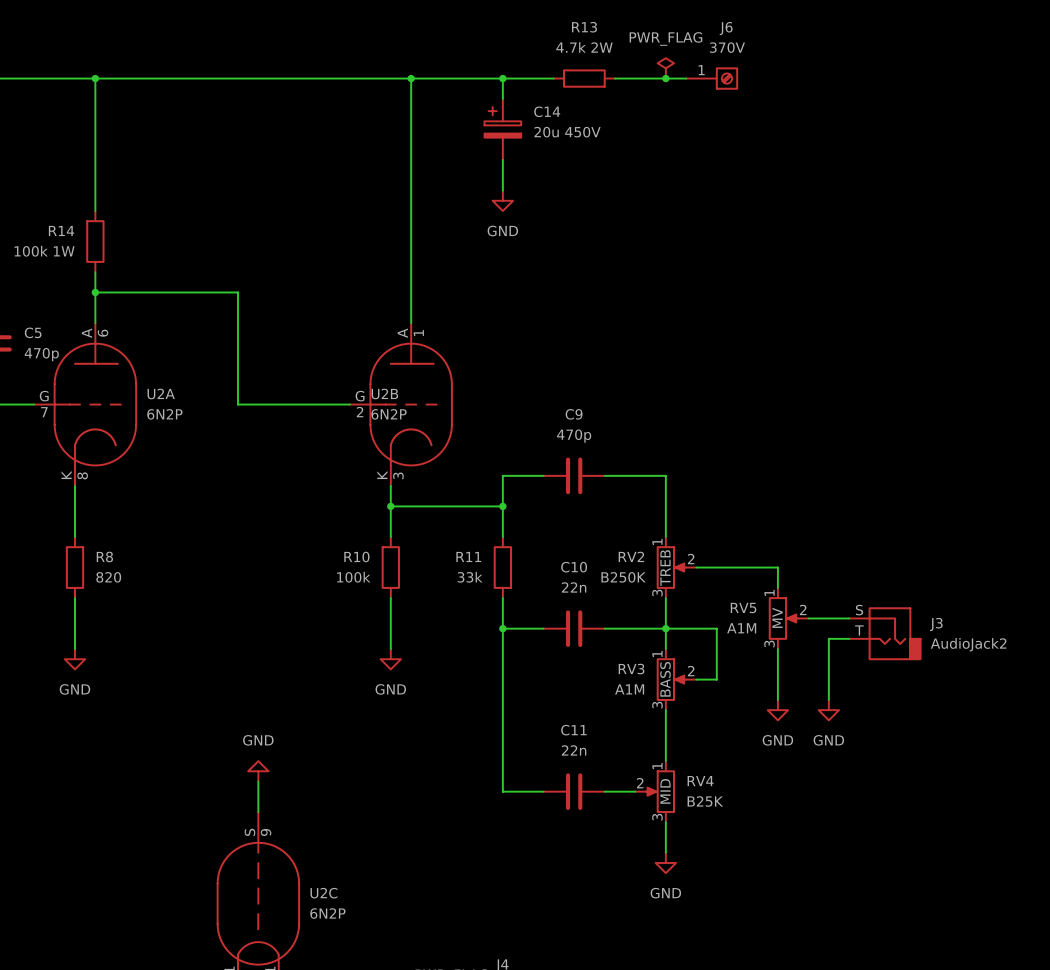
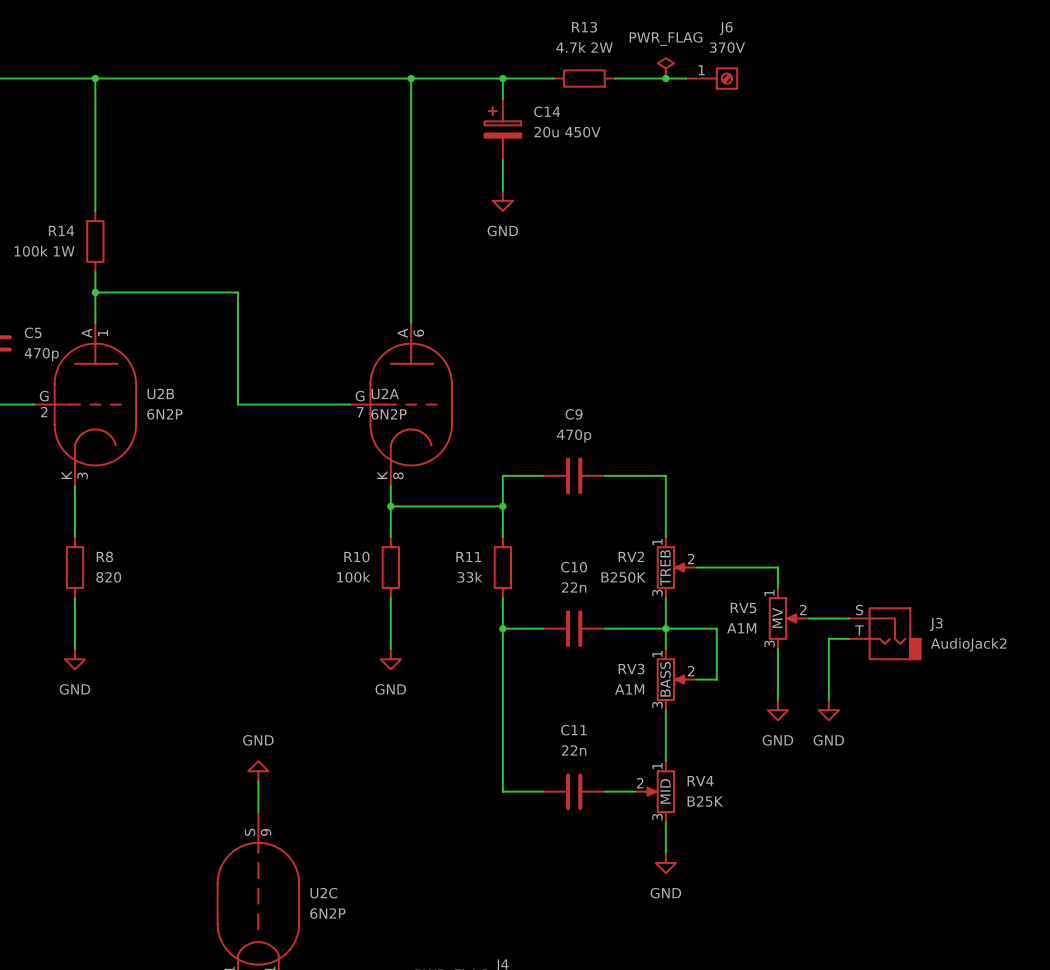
U2A name position: U2A (161, 393) -> U2A (385, 393)
U2B name position: U2B (384, 393) -> U2B (160, 393)
U2A position: (85, 404) -> (400, 404)
U2B position: (400, 404) -> (85, 404)

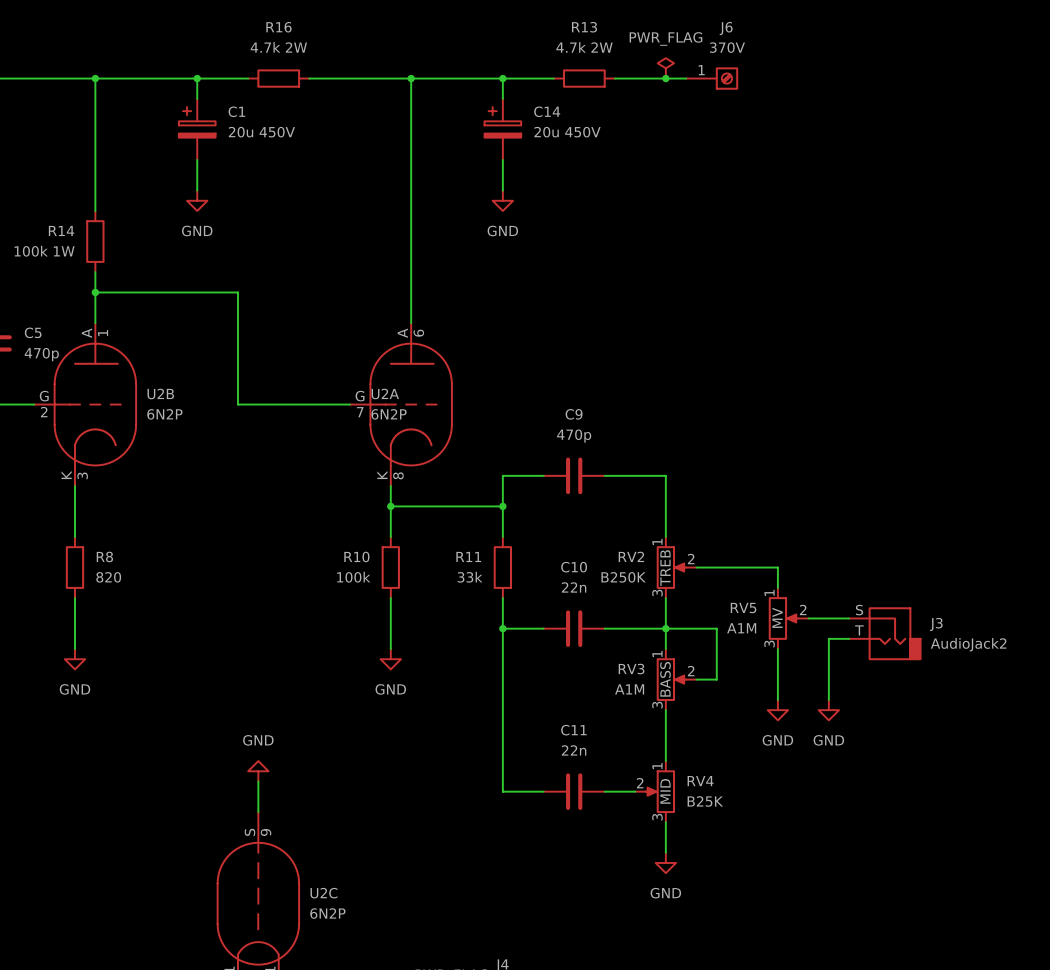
wire: none -> (197, 78) (197, 98)
junction: none -> (197, 78)
wire: (248, 78) (309, 78) -> none
R16: none -> 4.7k 2W (278, 78)
C1: none -> 20u 450V (197, 129)
wire: none -> (197, 160) (197, 190)
power symbol: none -> GND (197, 200)

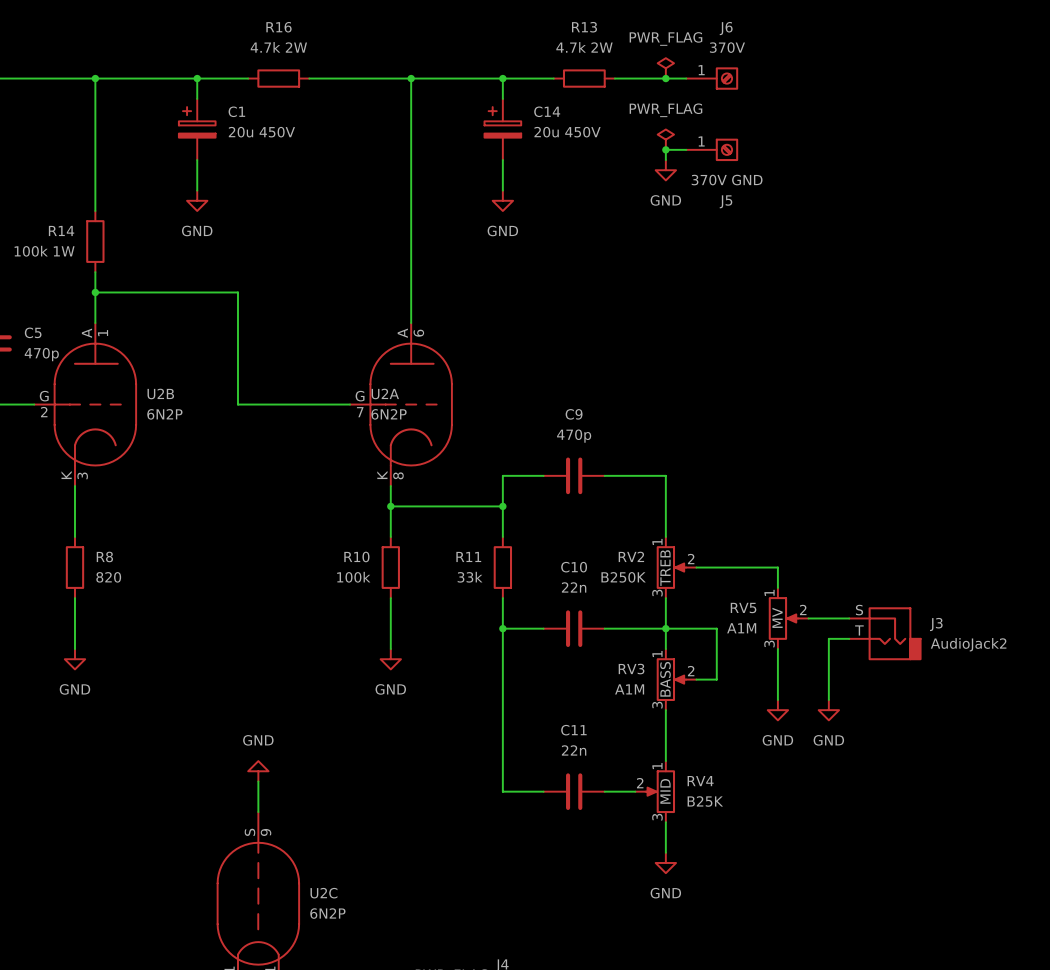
power symbol: none -> PWR_FLAG (665, 139)
junction: none -> (665, 149)
wire: none -> (686, 149) (665, 149) (665, 160)
J5: none -> 370V GND (712, 149)
power symbol: none -> GND (665, 170)

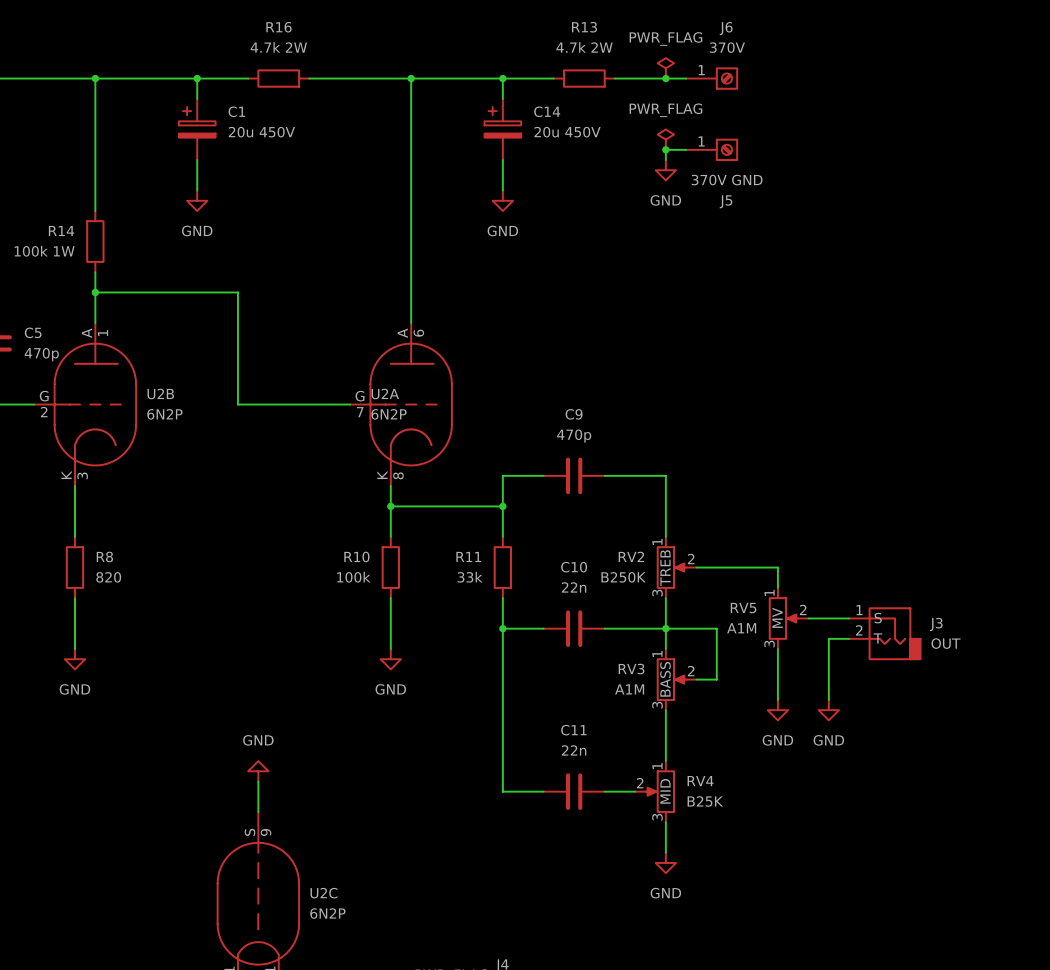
J3 pin number: S (859, 610) -> 1 (859, 610)
J3 pin name: none -> S (878, 618)
J3 pin number: T (859, 630) -> 2 (859, 630)
J3 pin name: none -> T (877, 638)
J3 value: AudioJack2 (968, 644) -> OUT (946, 643)

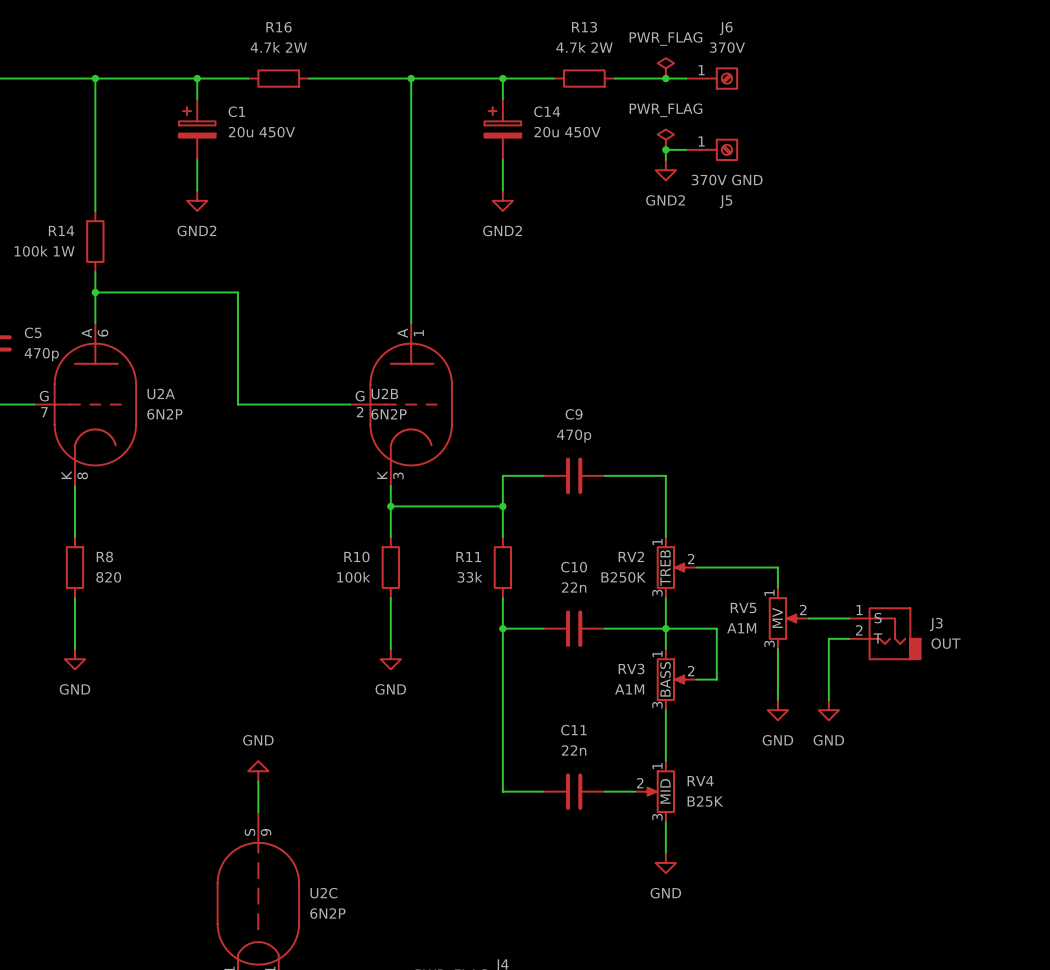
power symbol: GND (665, 170) -> GND2 (665, 170)
power symbol: GND (197, 200) -> GND2 (197, 200)
power symbol: GND (502, 200) -> GND2 (502, 200)
U2B name position: U2B (160, 393) -> U2B (384, 393)
U2A name position: U2A (385, 393) -> U2A (161, 393)
U2B position: (85, 404) -> (400, 404)
U2A position: (400, 404) -> (85, 404)

